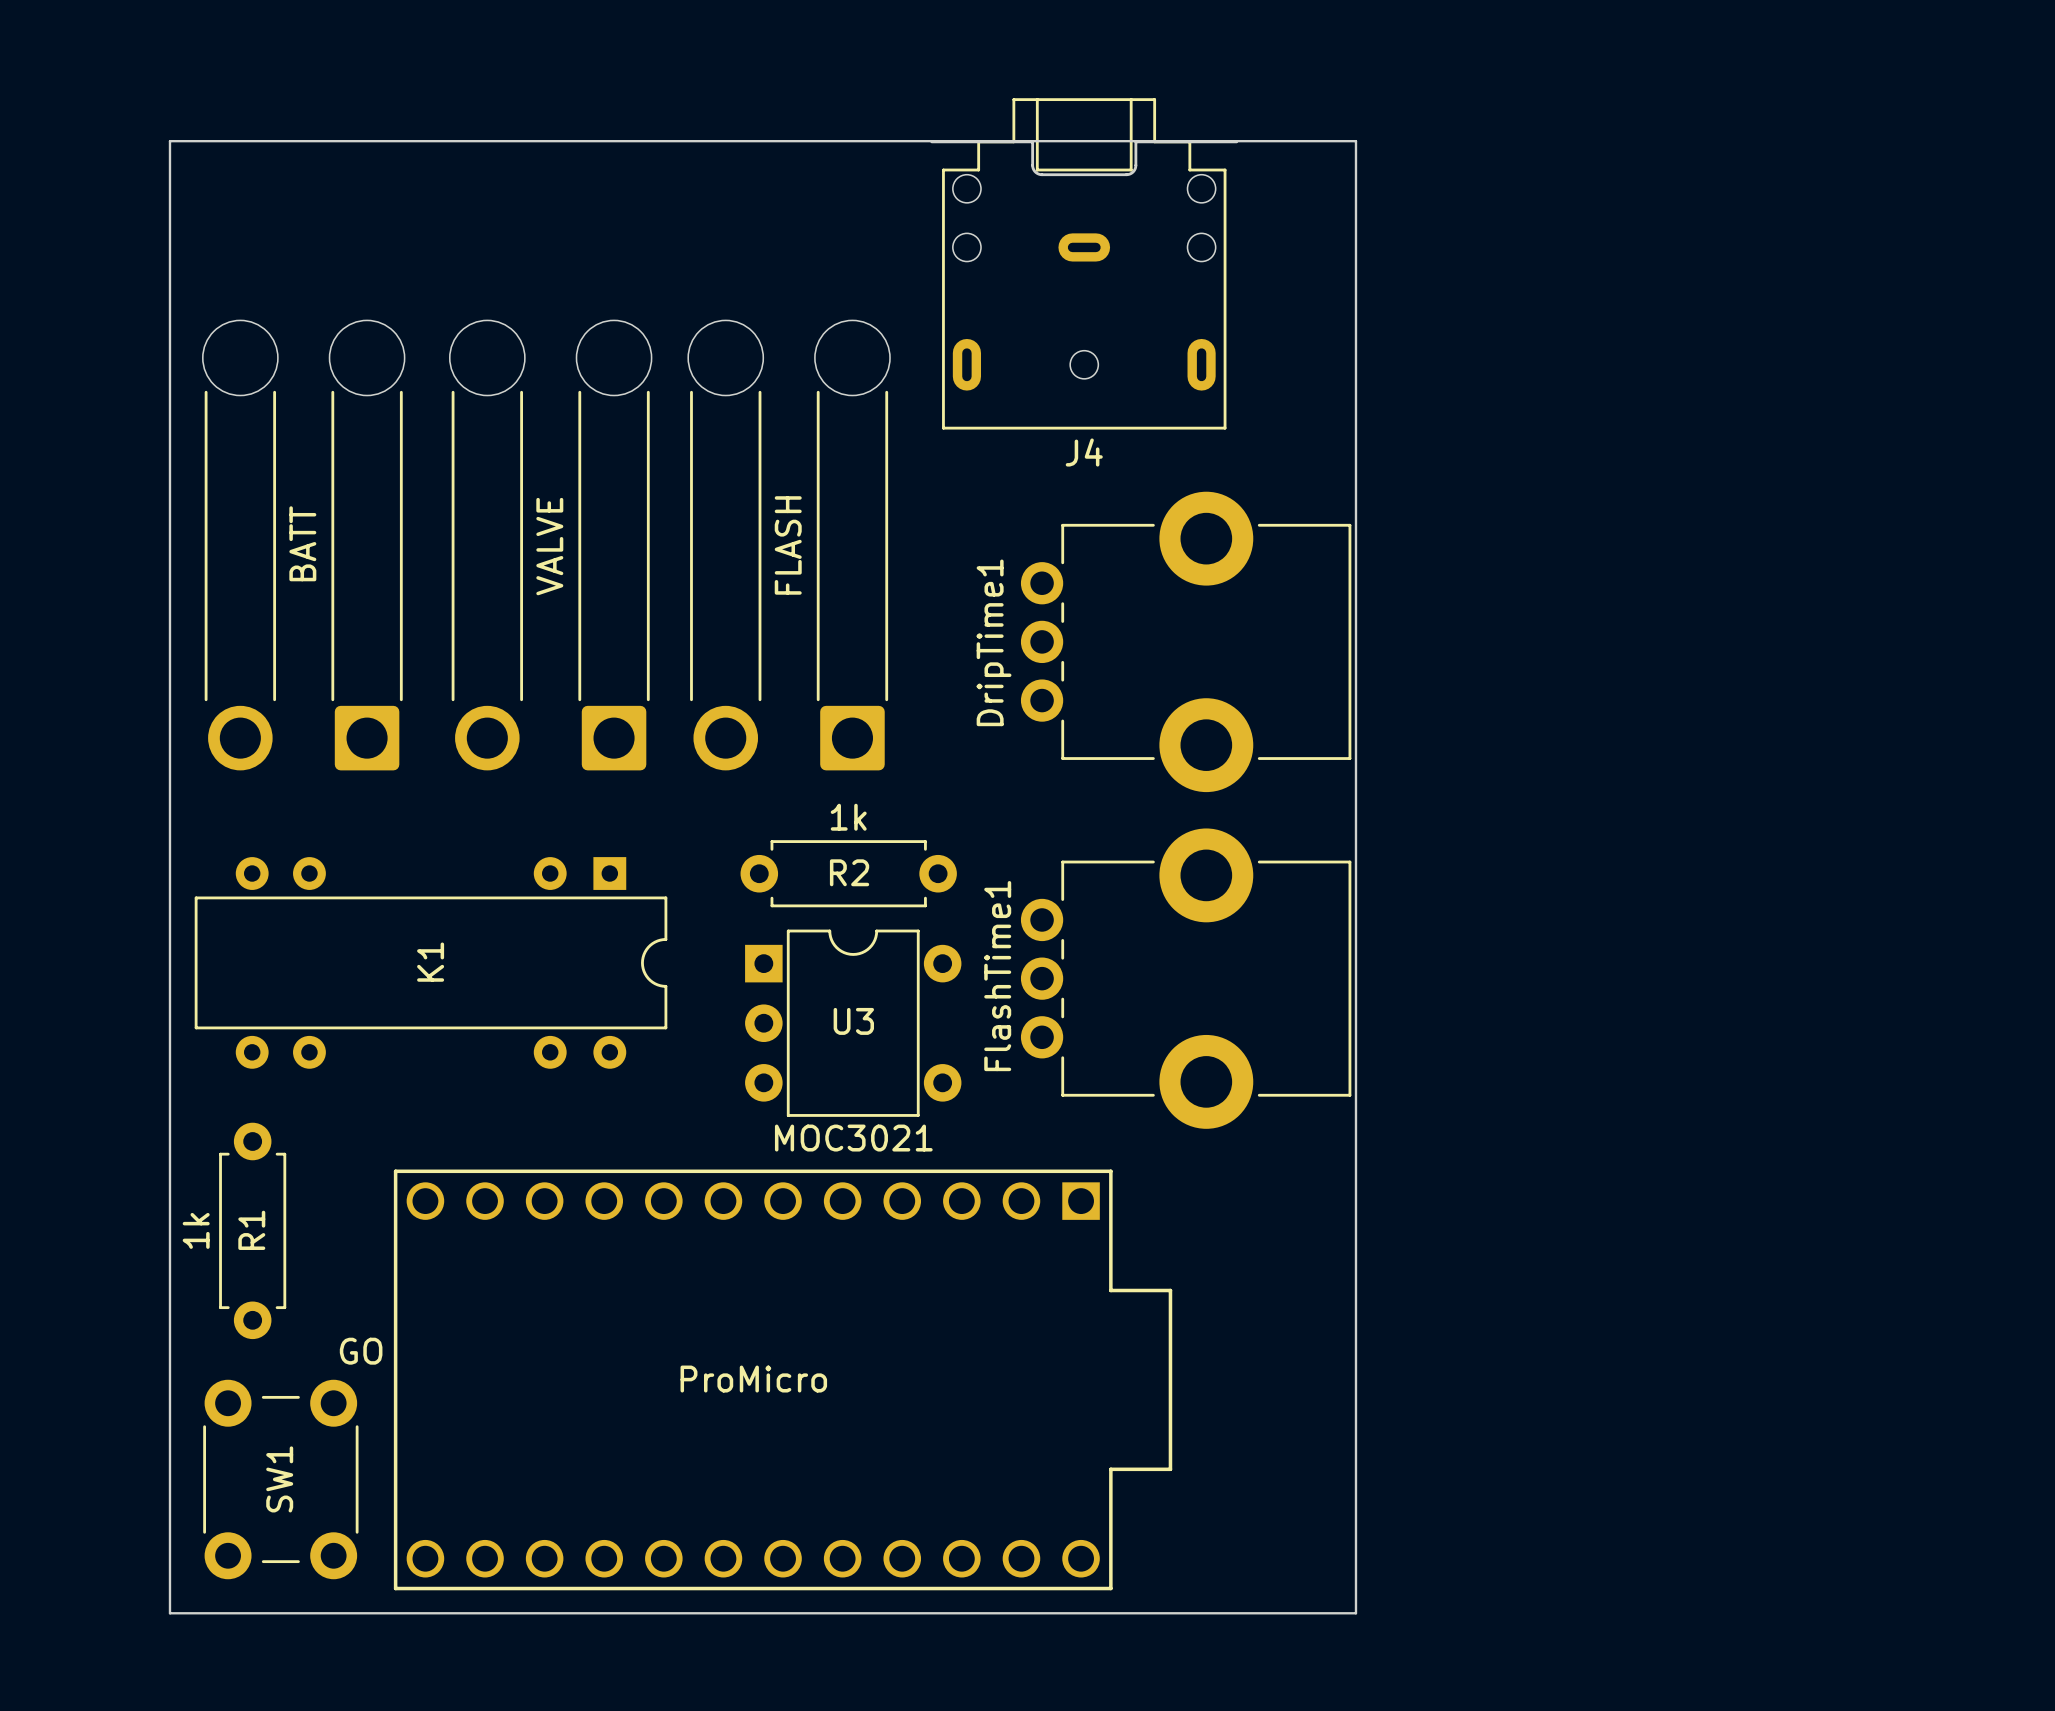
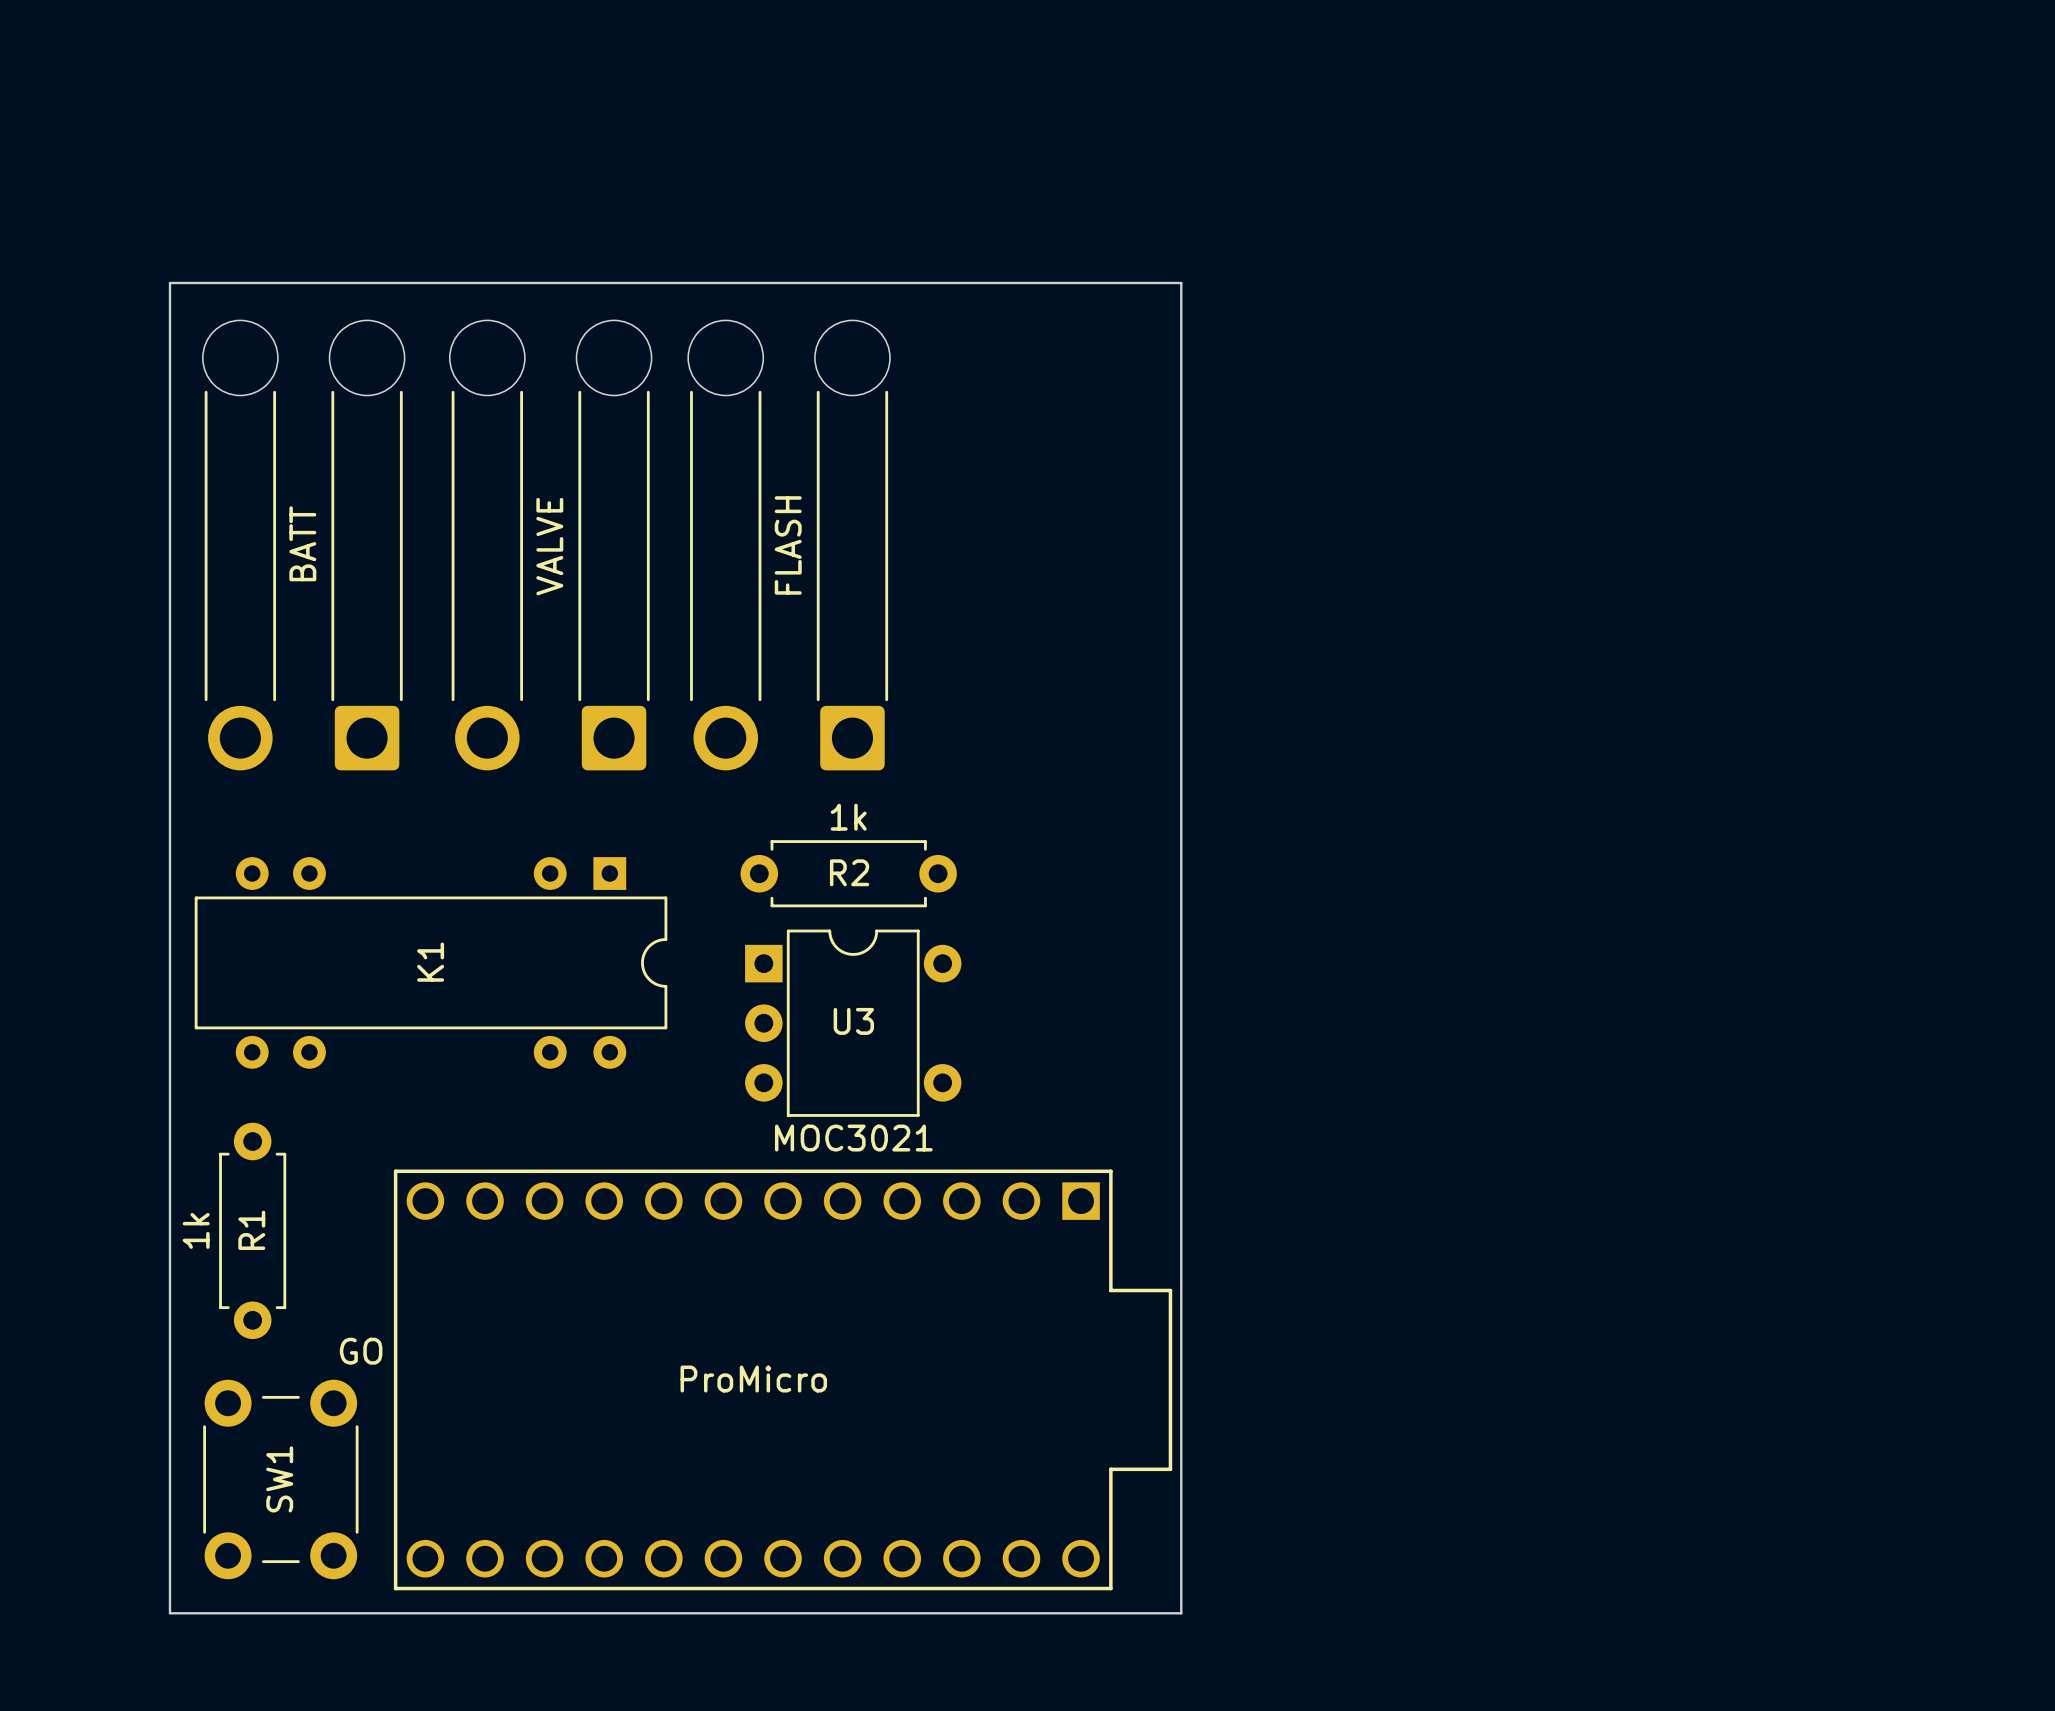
J4: (1084, 263) -> none
board edge: (169, 282) (169, 141) (1355, 141) (1355, 1613) (1181, 1613) -> (169, 282) (1181, 282) (1181, 1613)
DripTime1: (1186, 641) -> none
FlashTime1: (1186, 978) -> none

